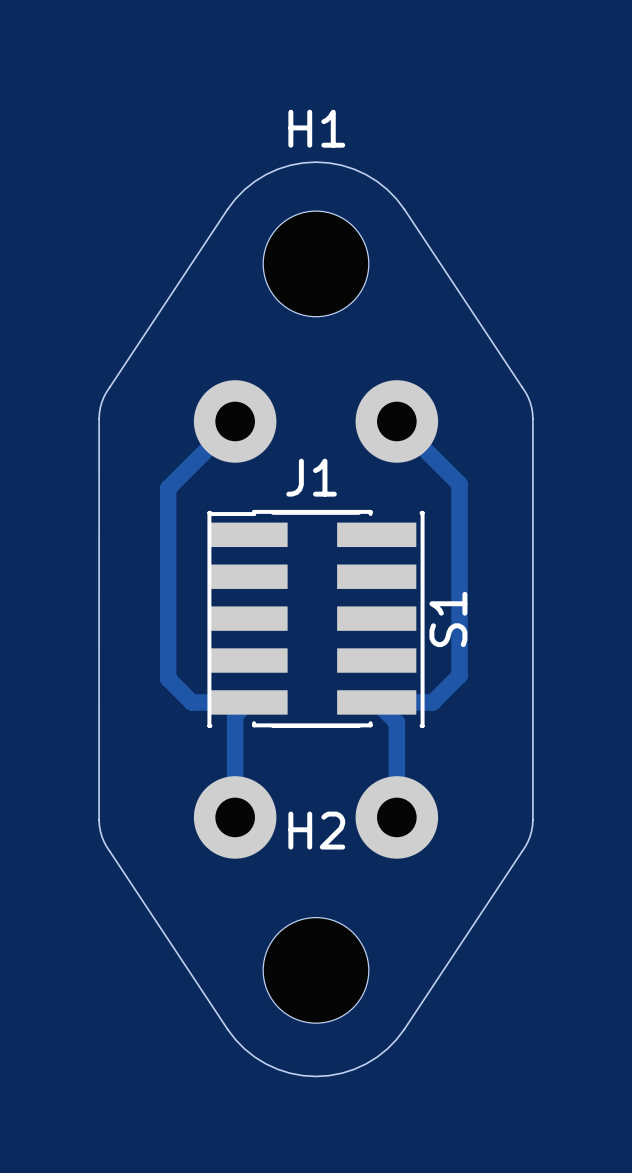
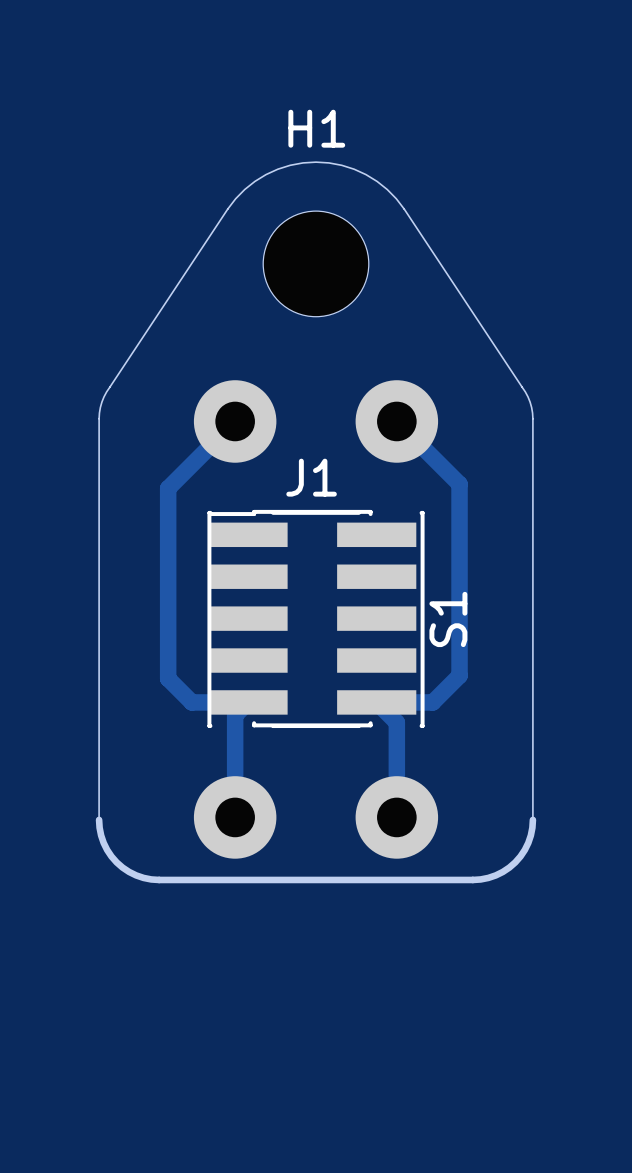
board edge: (99, 819) (100, 831) (106, 846) (235, 1039) (244, 1049) (265, 1063) (290, 1073) (315, 1076) (341, 1073) (354, 1069) (377, 1057) (396, 1039) (525, 846) (531, 831) (532, 819) -> (99, 819) (103, 842) (116, 862) (136, 875) (159, 879) (480, 879) (502, 871) (520, 856) (528, 842) (532, 819)
H2: (316, 970) -> none

